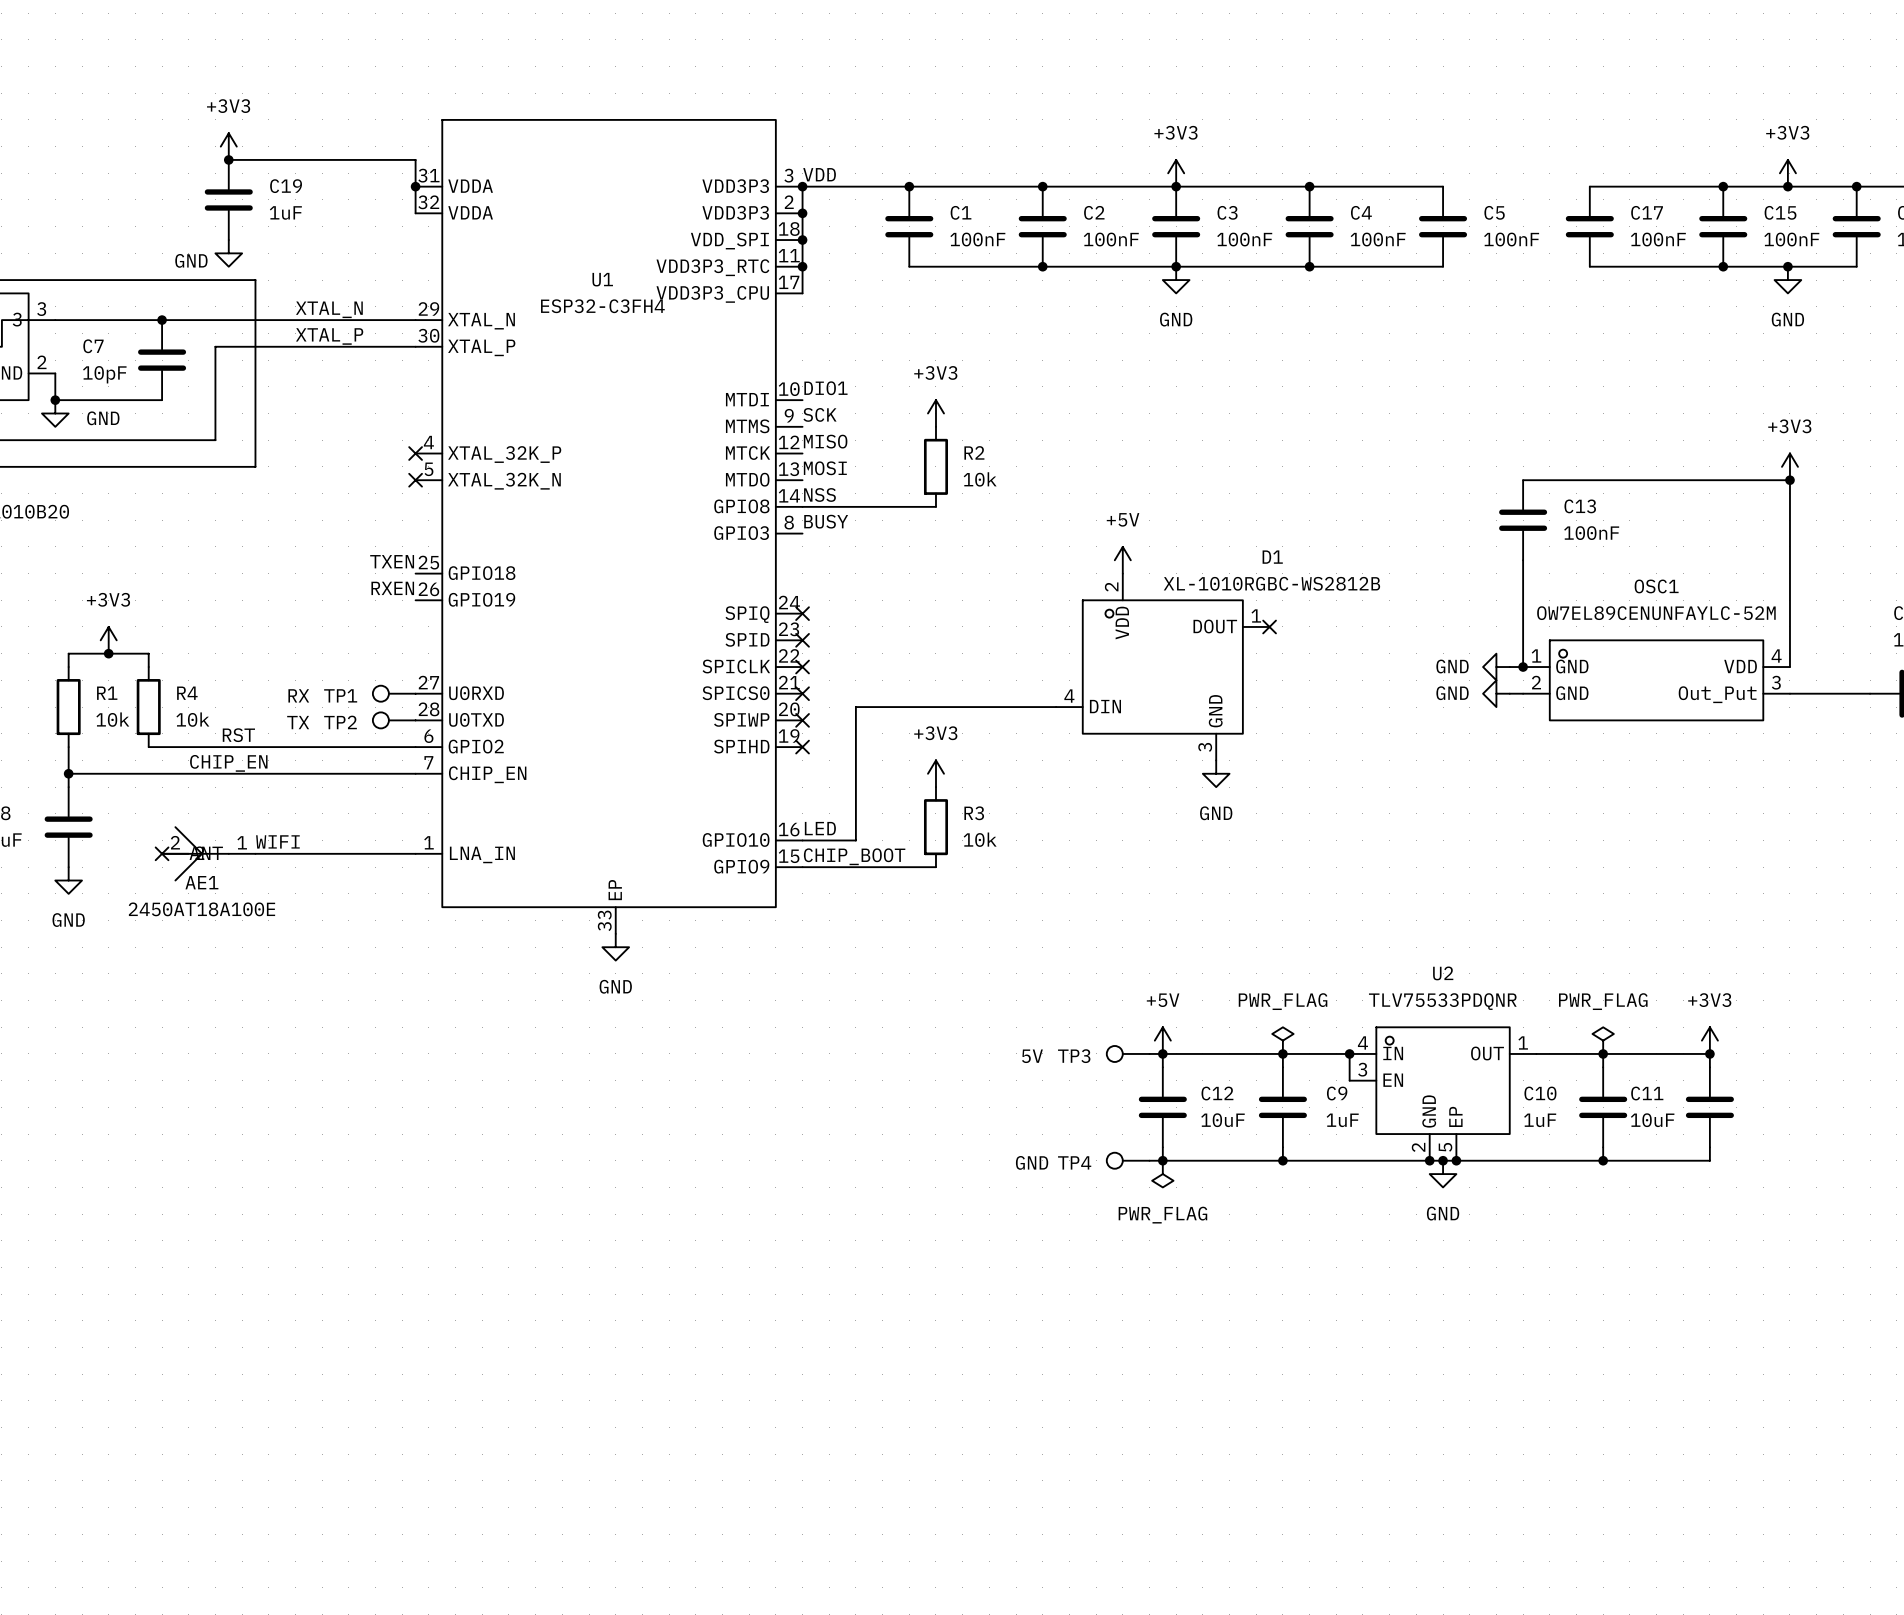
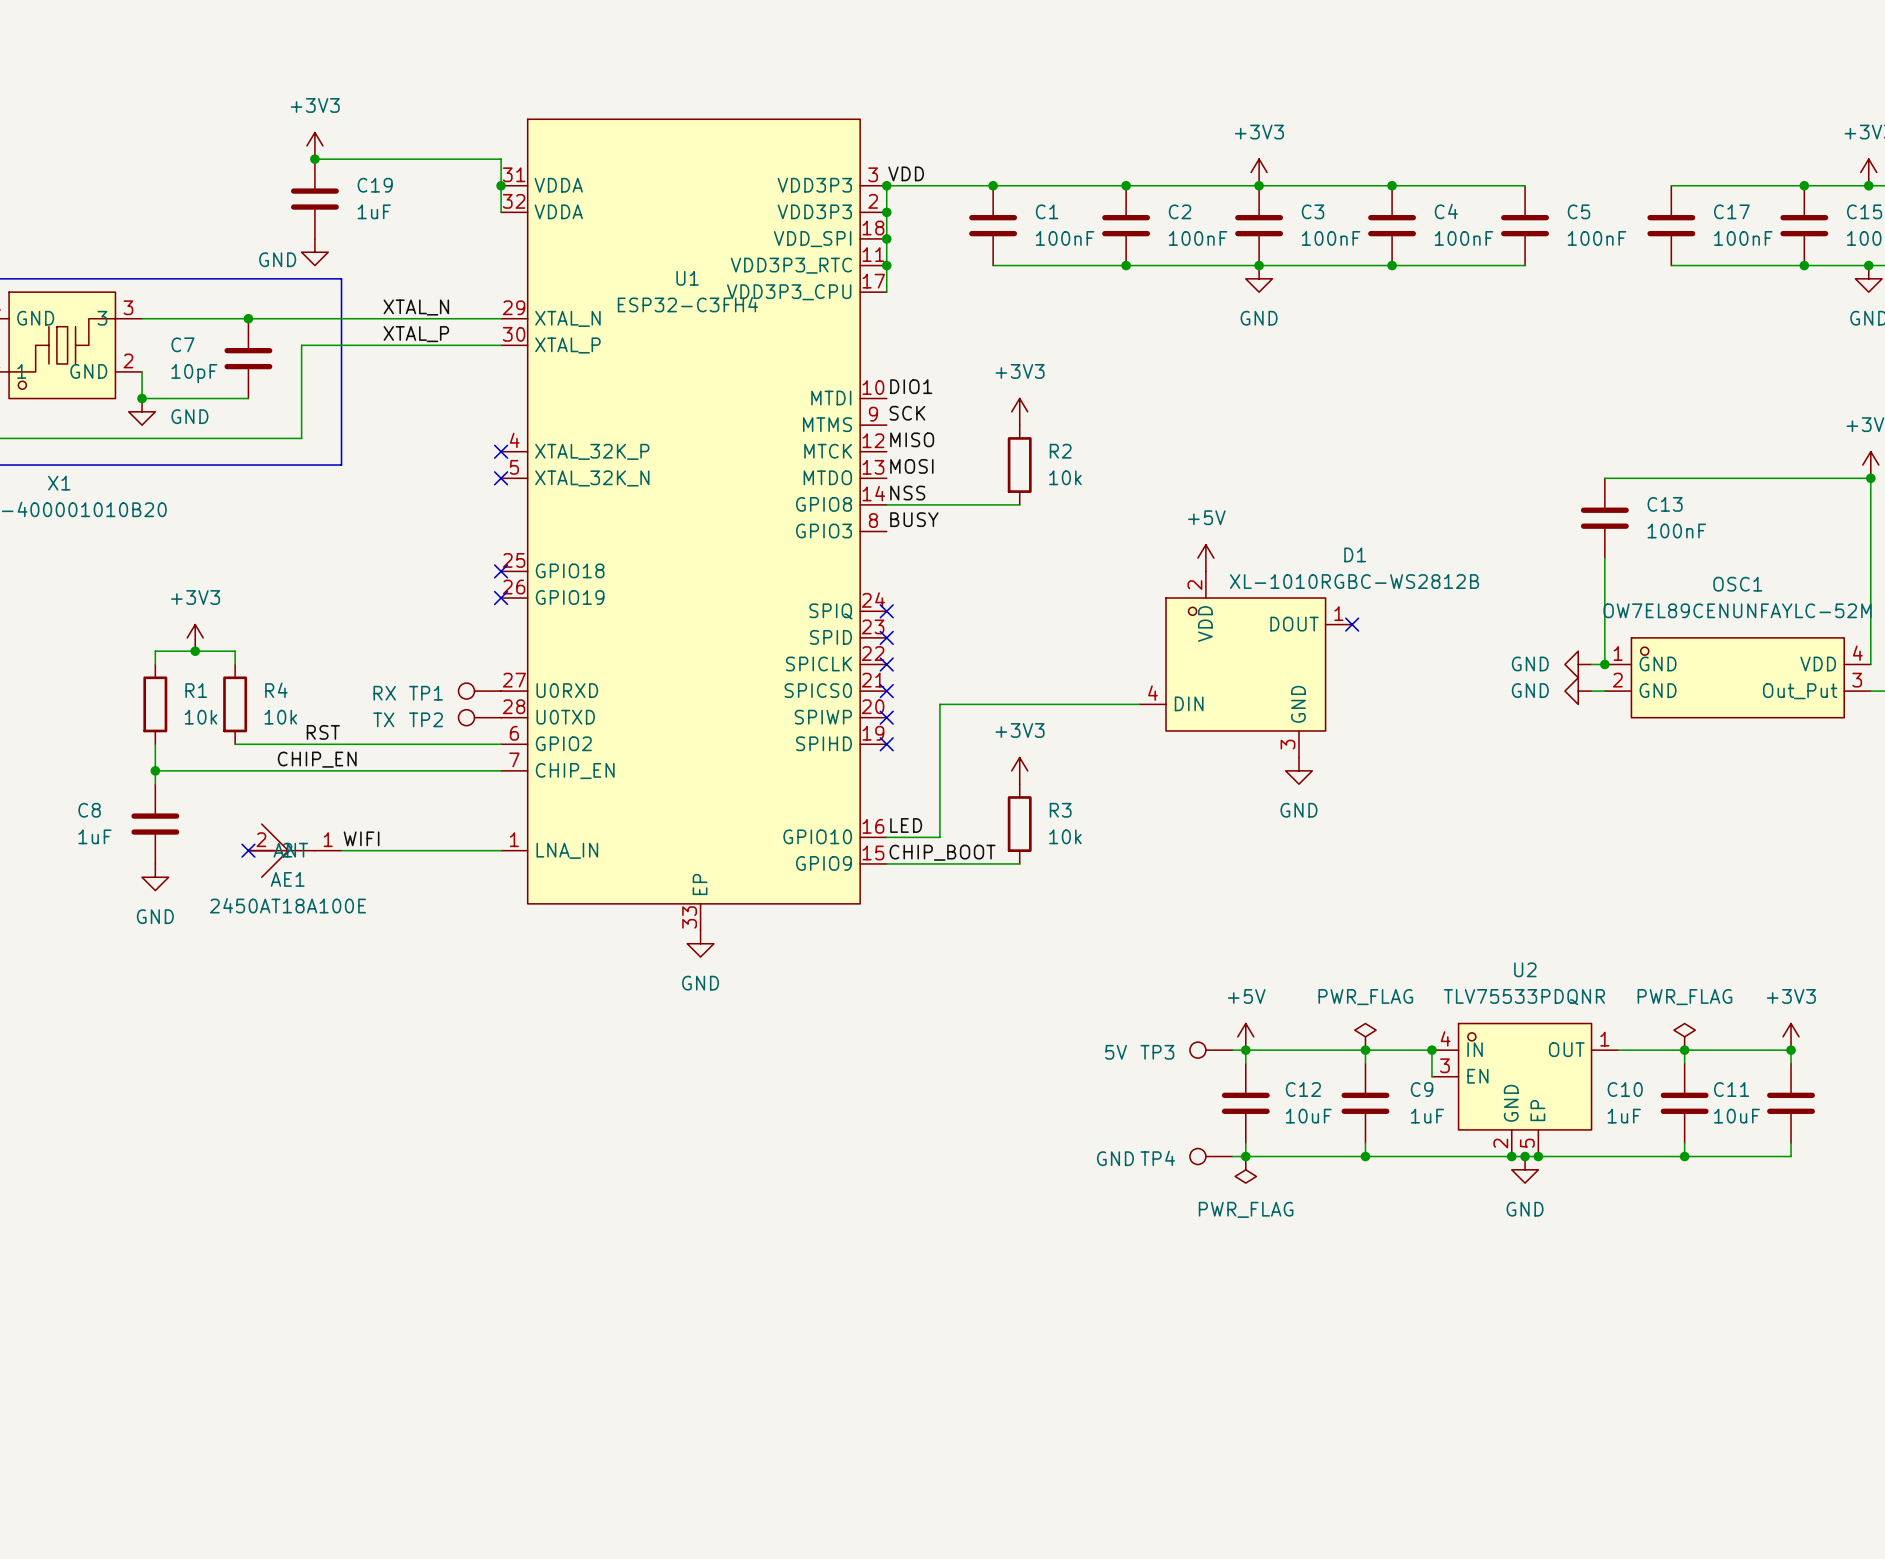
label: TXEN (392, 561) -> none
no-connect mark: none -> (501, 571)
label: RXEN (392, 588) -> none
no-connect mark: none -> (501, 598)

